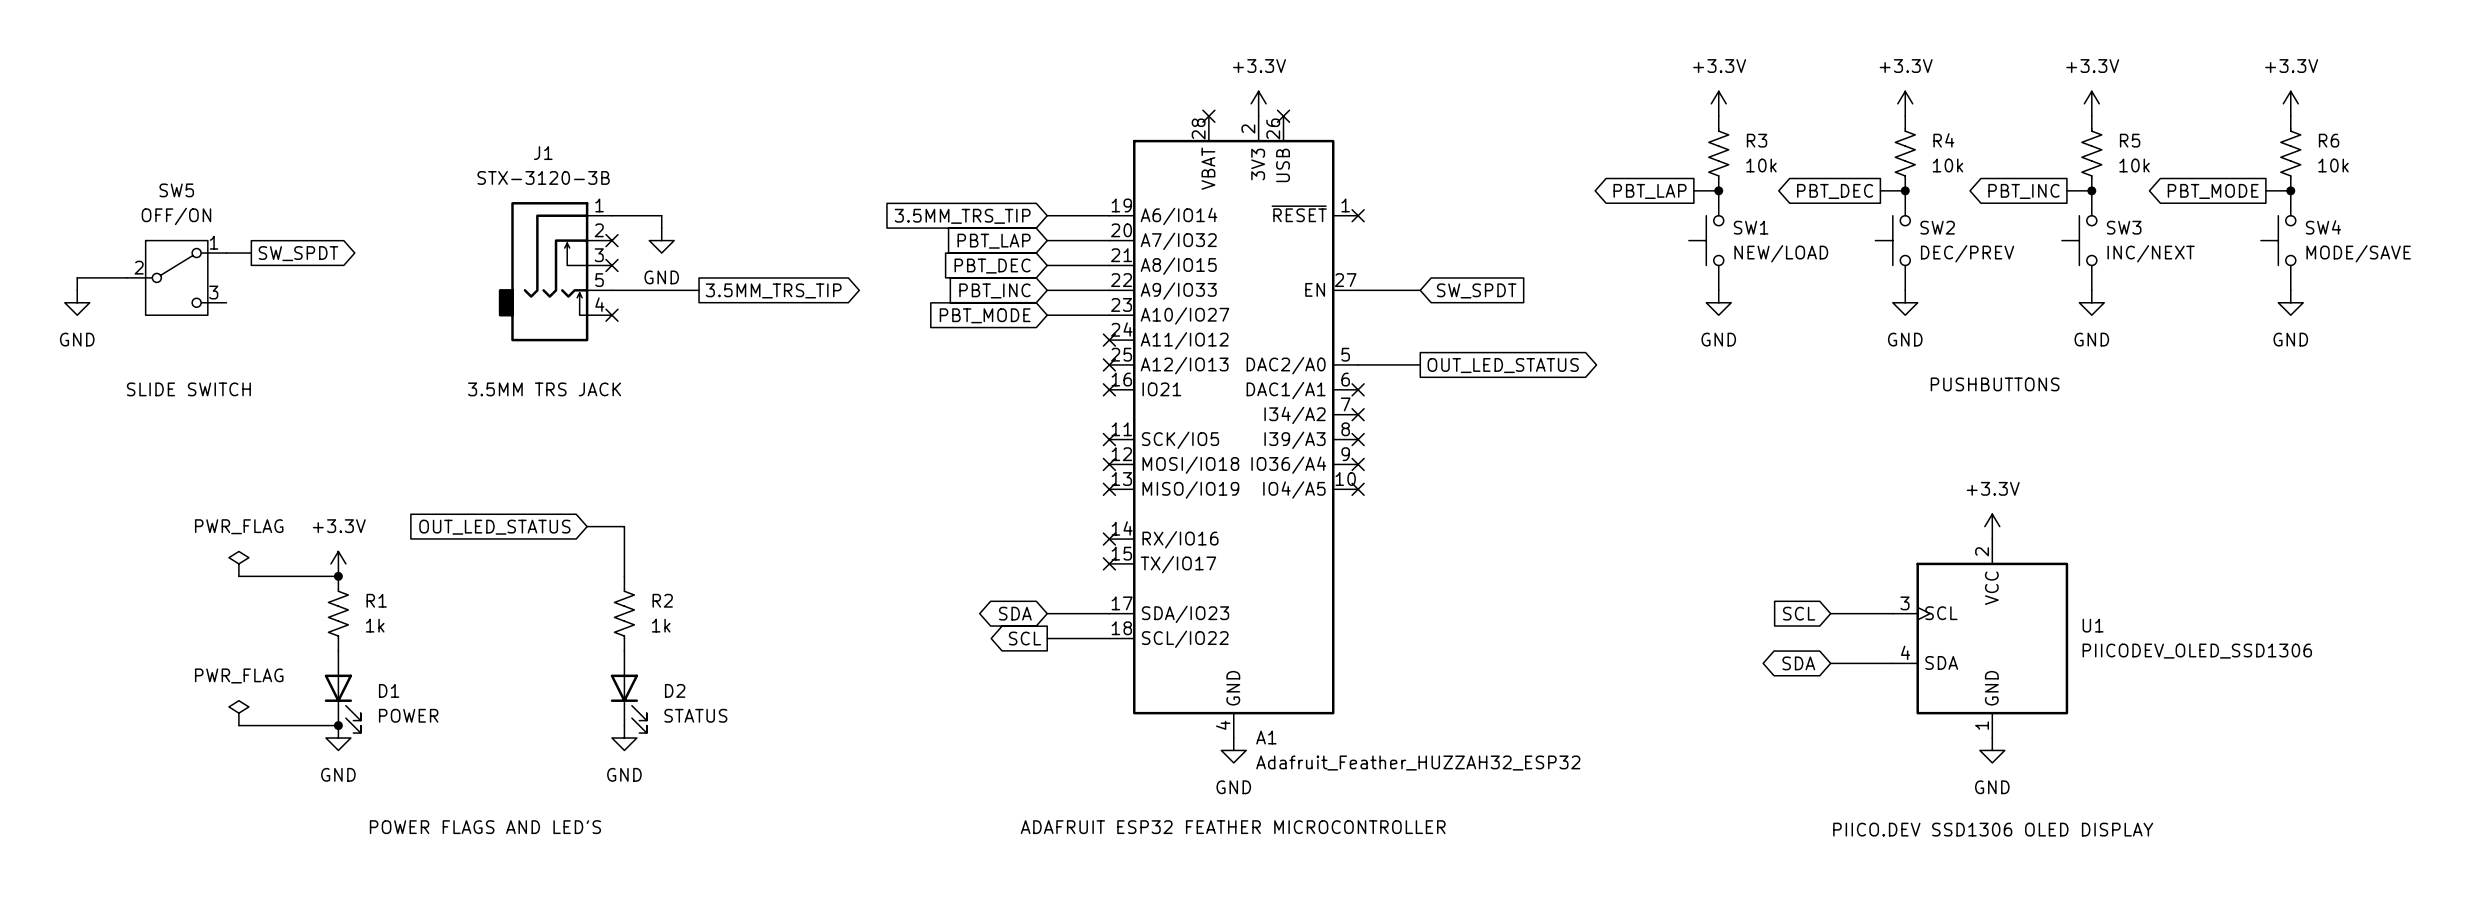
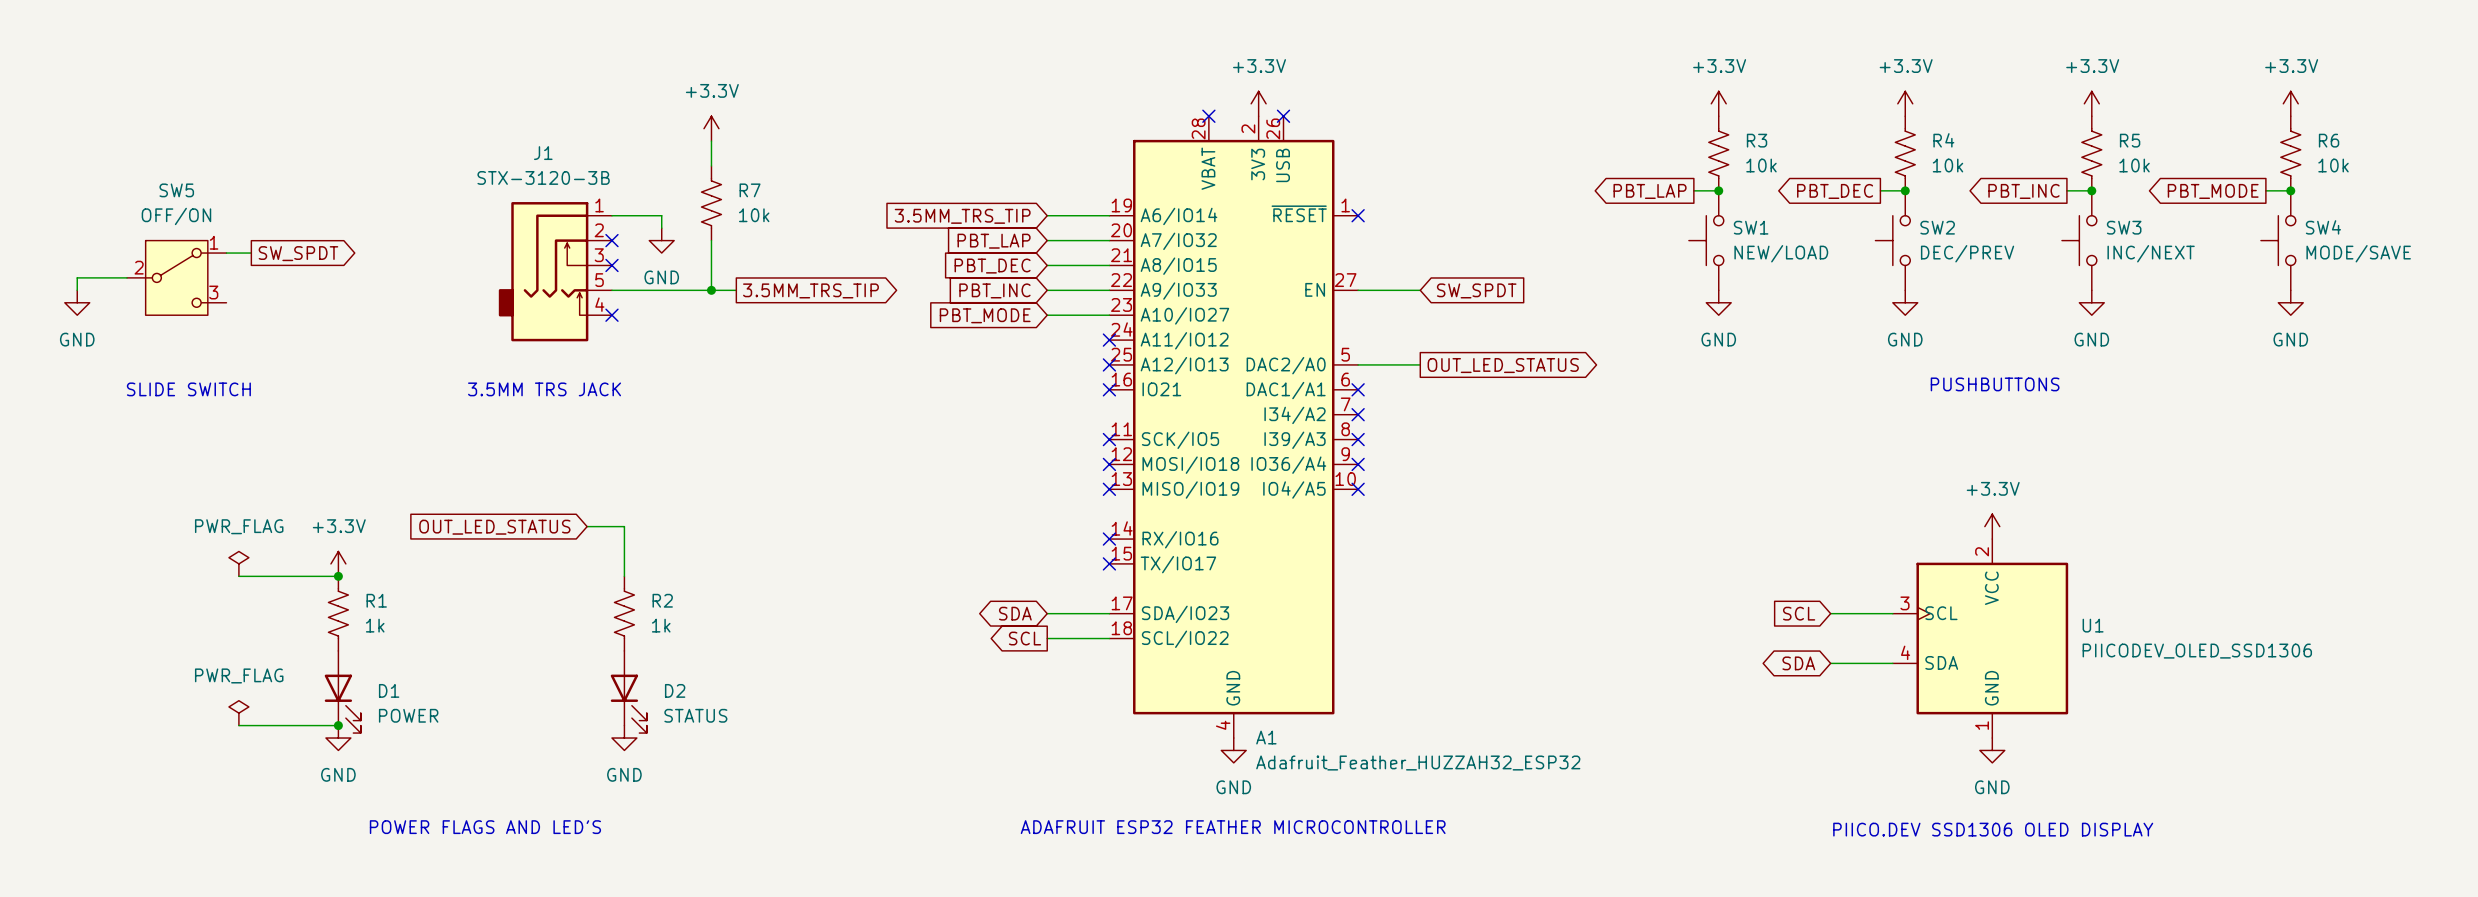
power symbol: none -> +3.3V (711, 128)
wire: none -> (711, 141) (711, 165)
R7: none -> 10k (711, 203)
wire: none -> (711, 240) (711, 290)
wire: none -> (699, 290) (736, 290)
junction: none -> (711, 290)
global label position: 3.5MM_TRS_TIP (773, 290) -> 3.5MM_TRS_TIP (810, 290)

